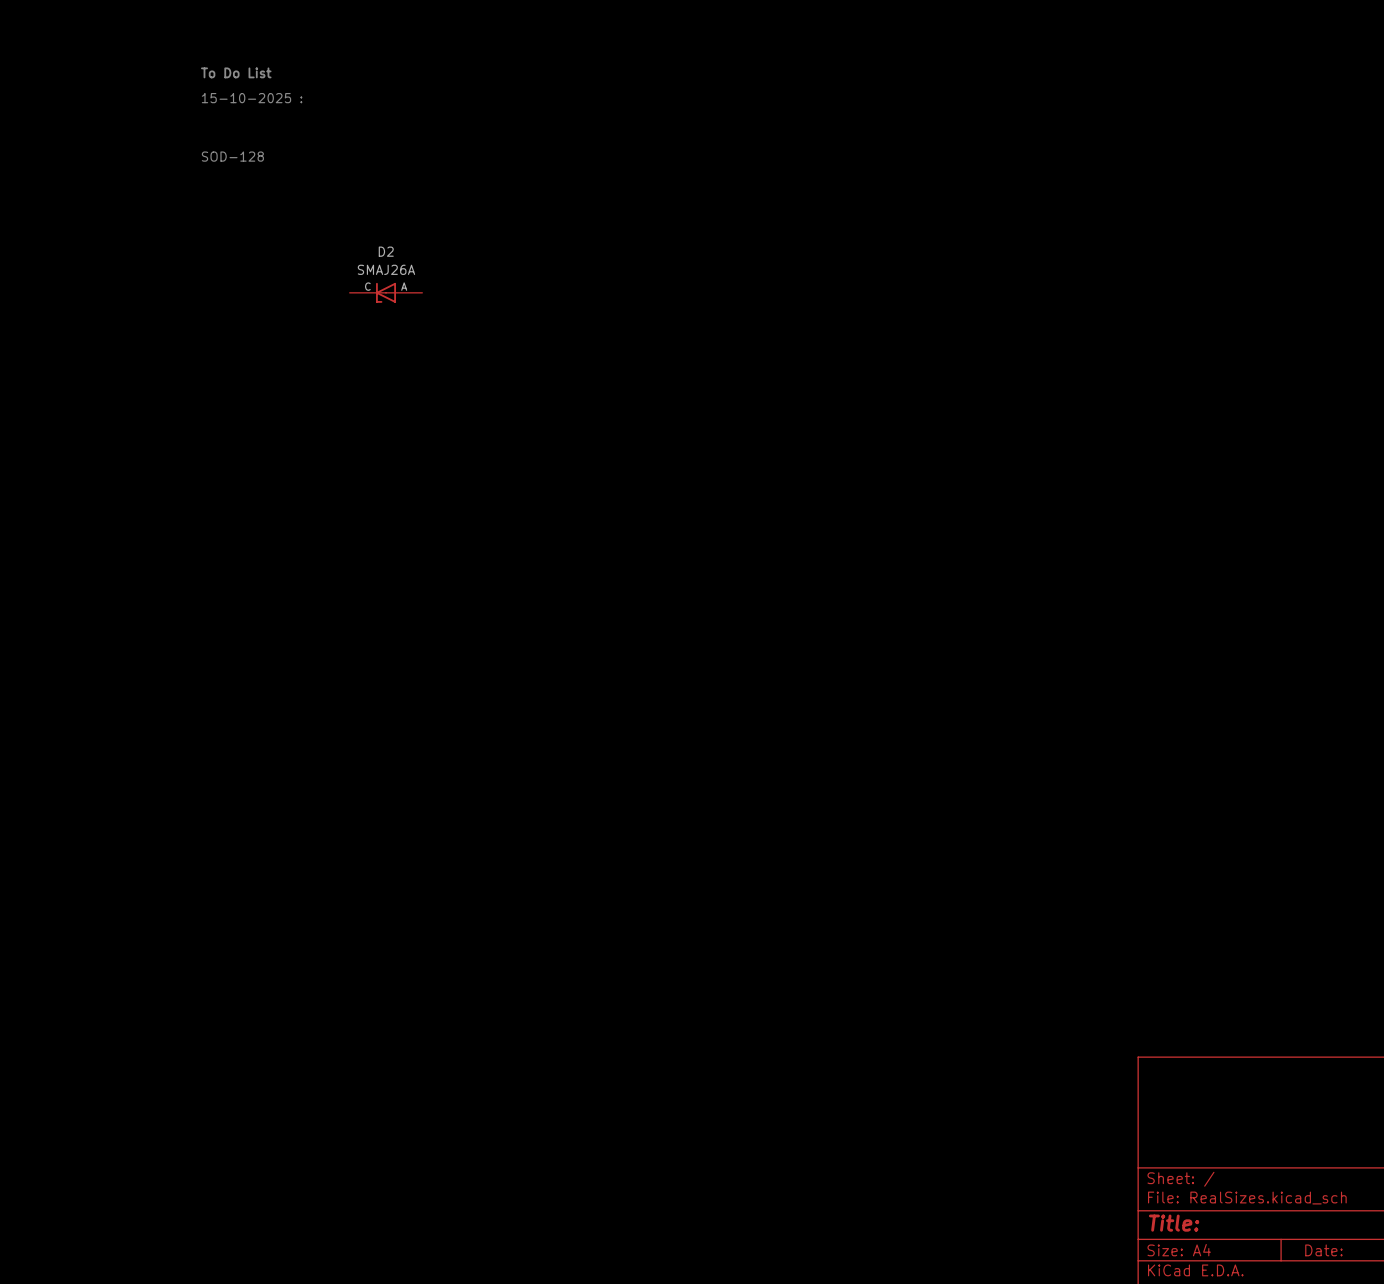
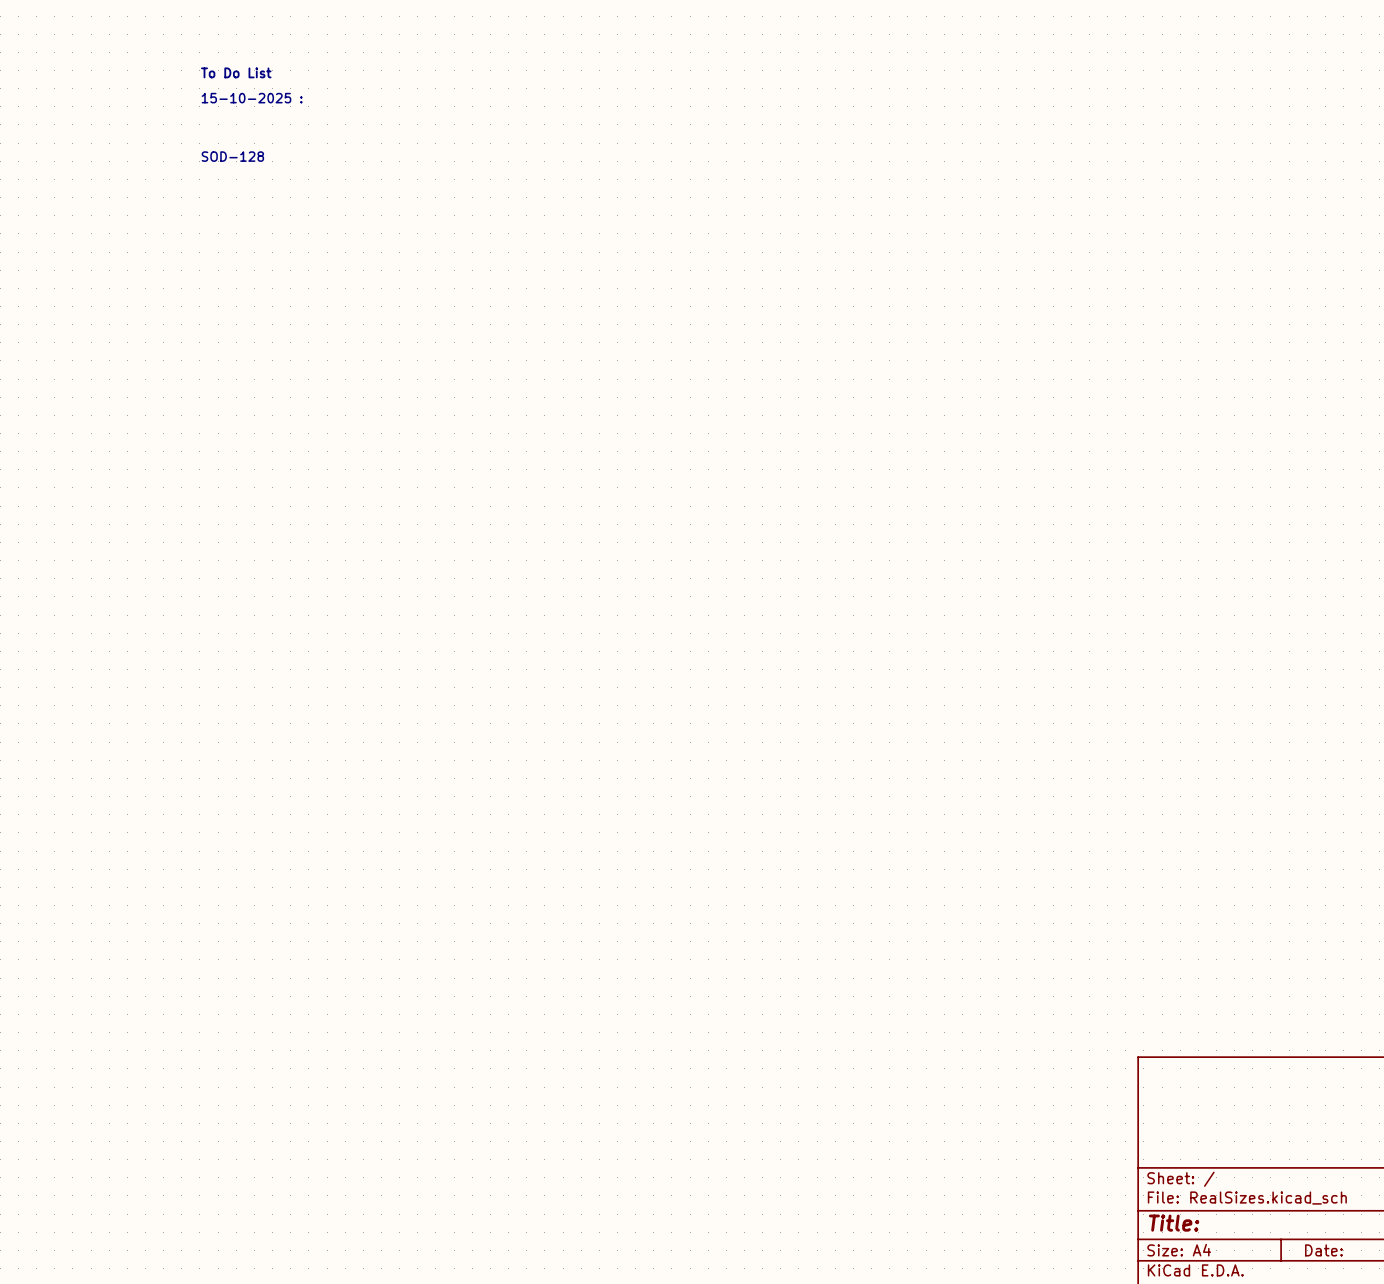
D2: SMAJ26A (386, 292) -> none

